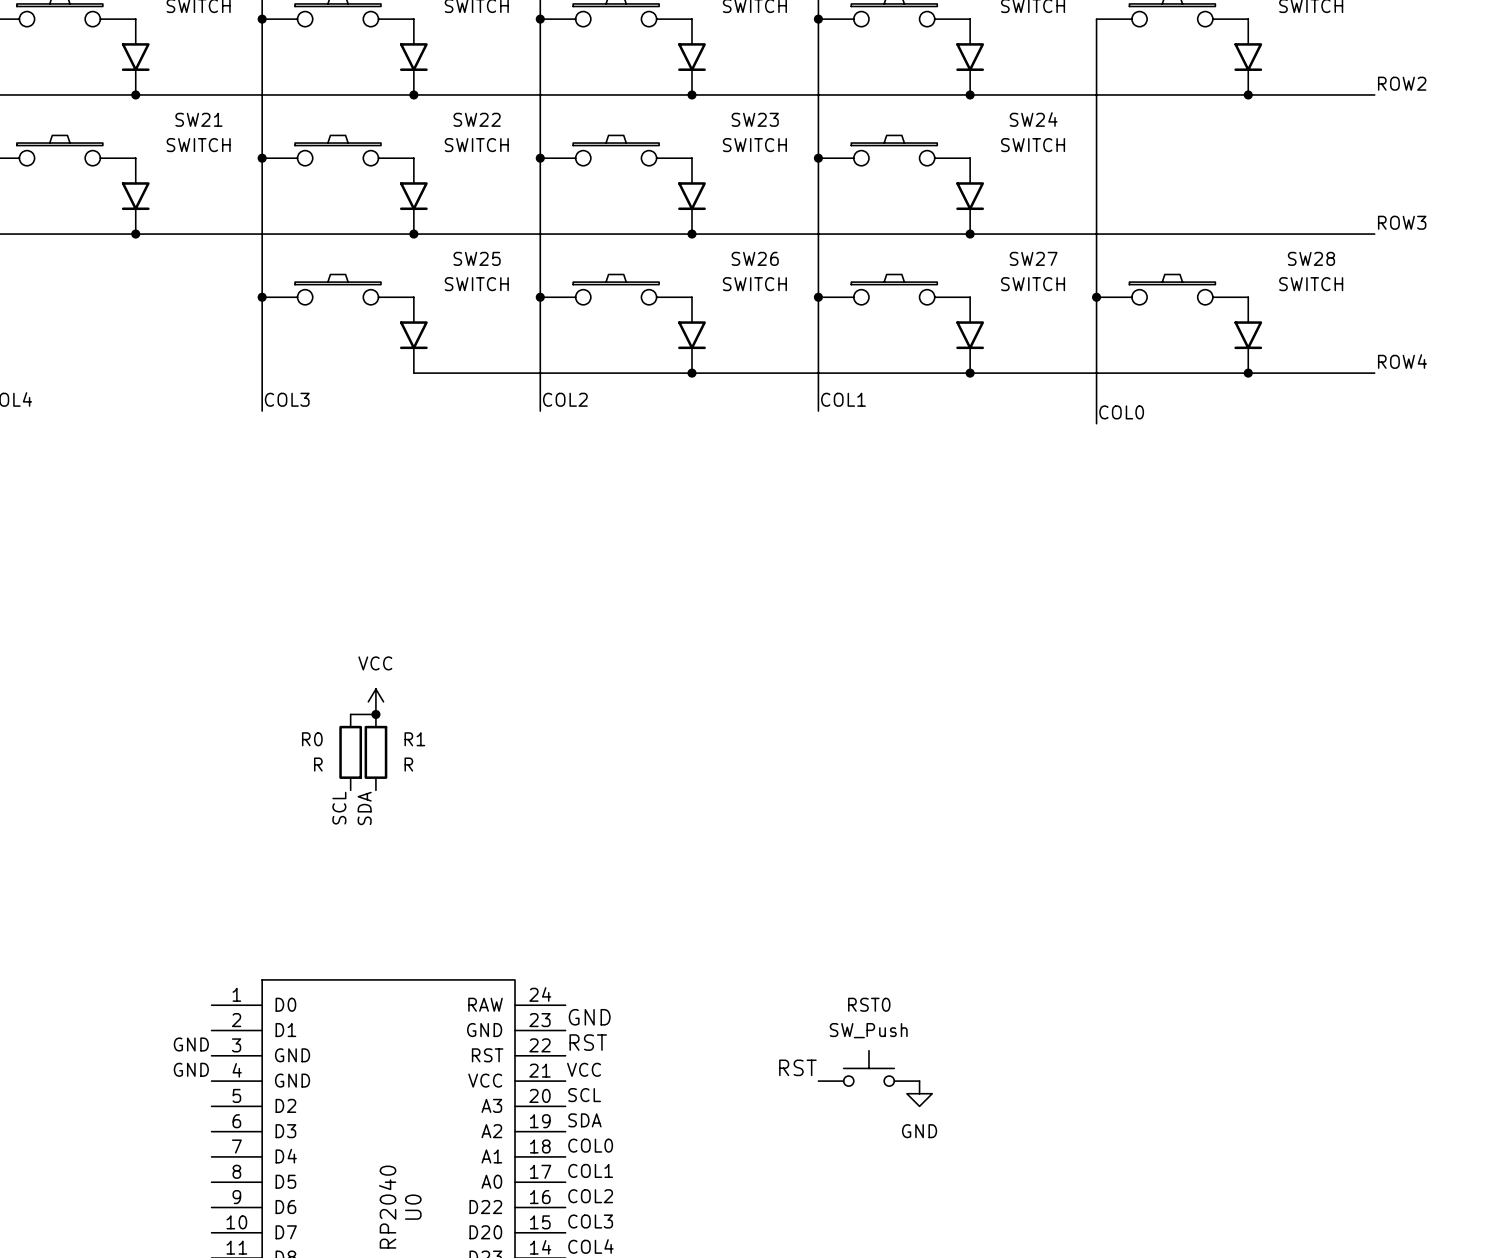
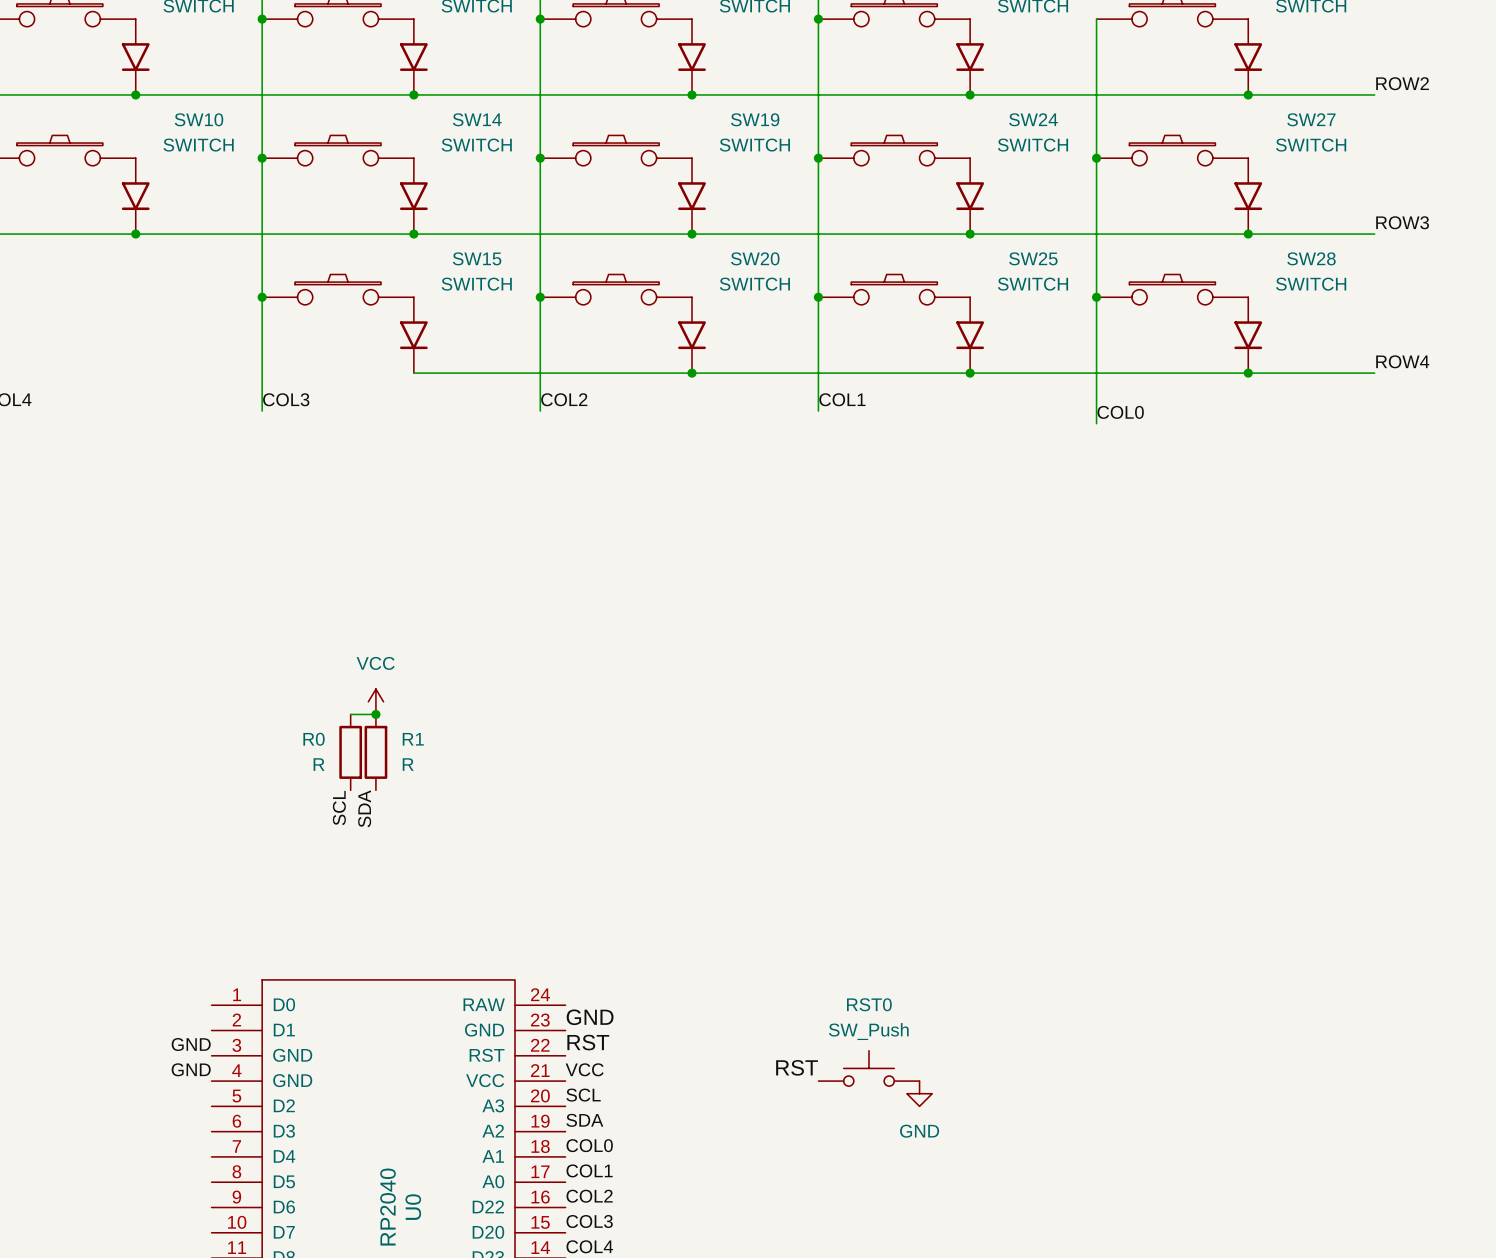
SW21 name: SW21 (198, 119) -> SW10 (199, 119)
SW22 name: SW22 (477, 119) -> SW14 (477, 119)
SW23 name: SW23 (755, 119) -> SW19 (755, 119)
junction: none -> (1096, 158)
SW27: none -> SWITCH (1179, 184)
junction: none -> (1248, 234)
SW25 name: SW25 (477, 258) -> SW15 (477, 258)
SW26 name: SW26 (755, 258) -> SW20 (755, 258)
SW27 name: SW27 (1033, 258) -> SW25 (1033, 258)

